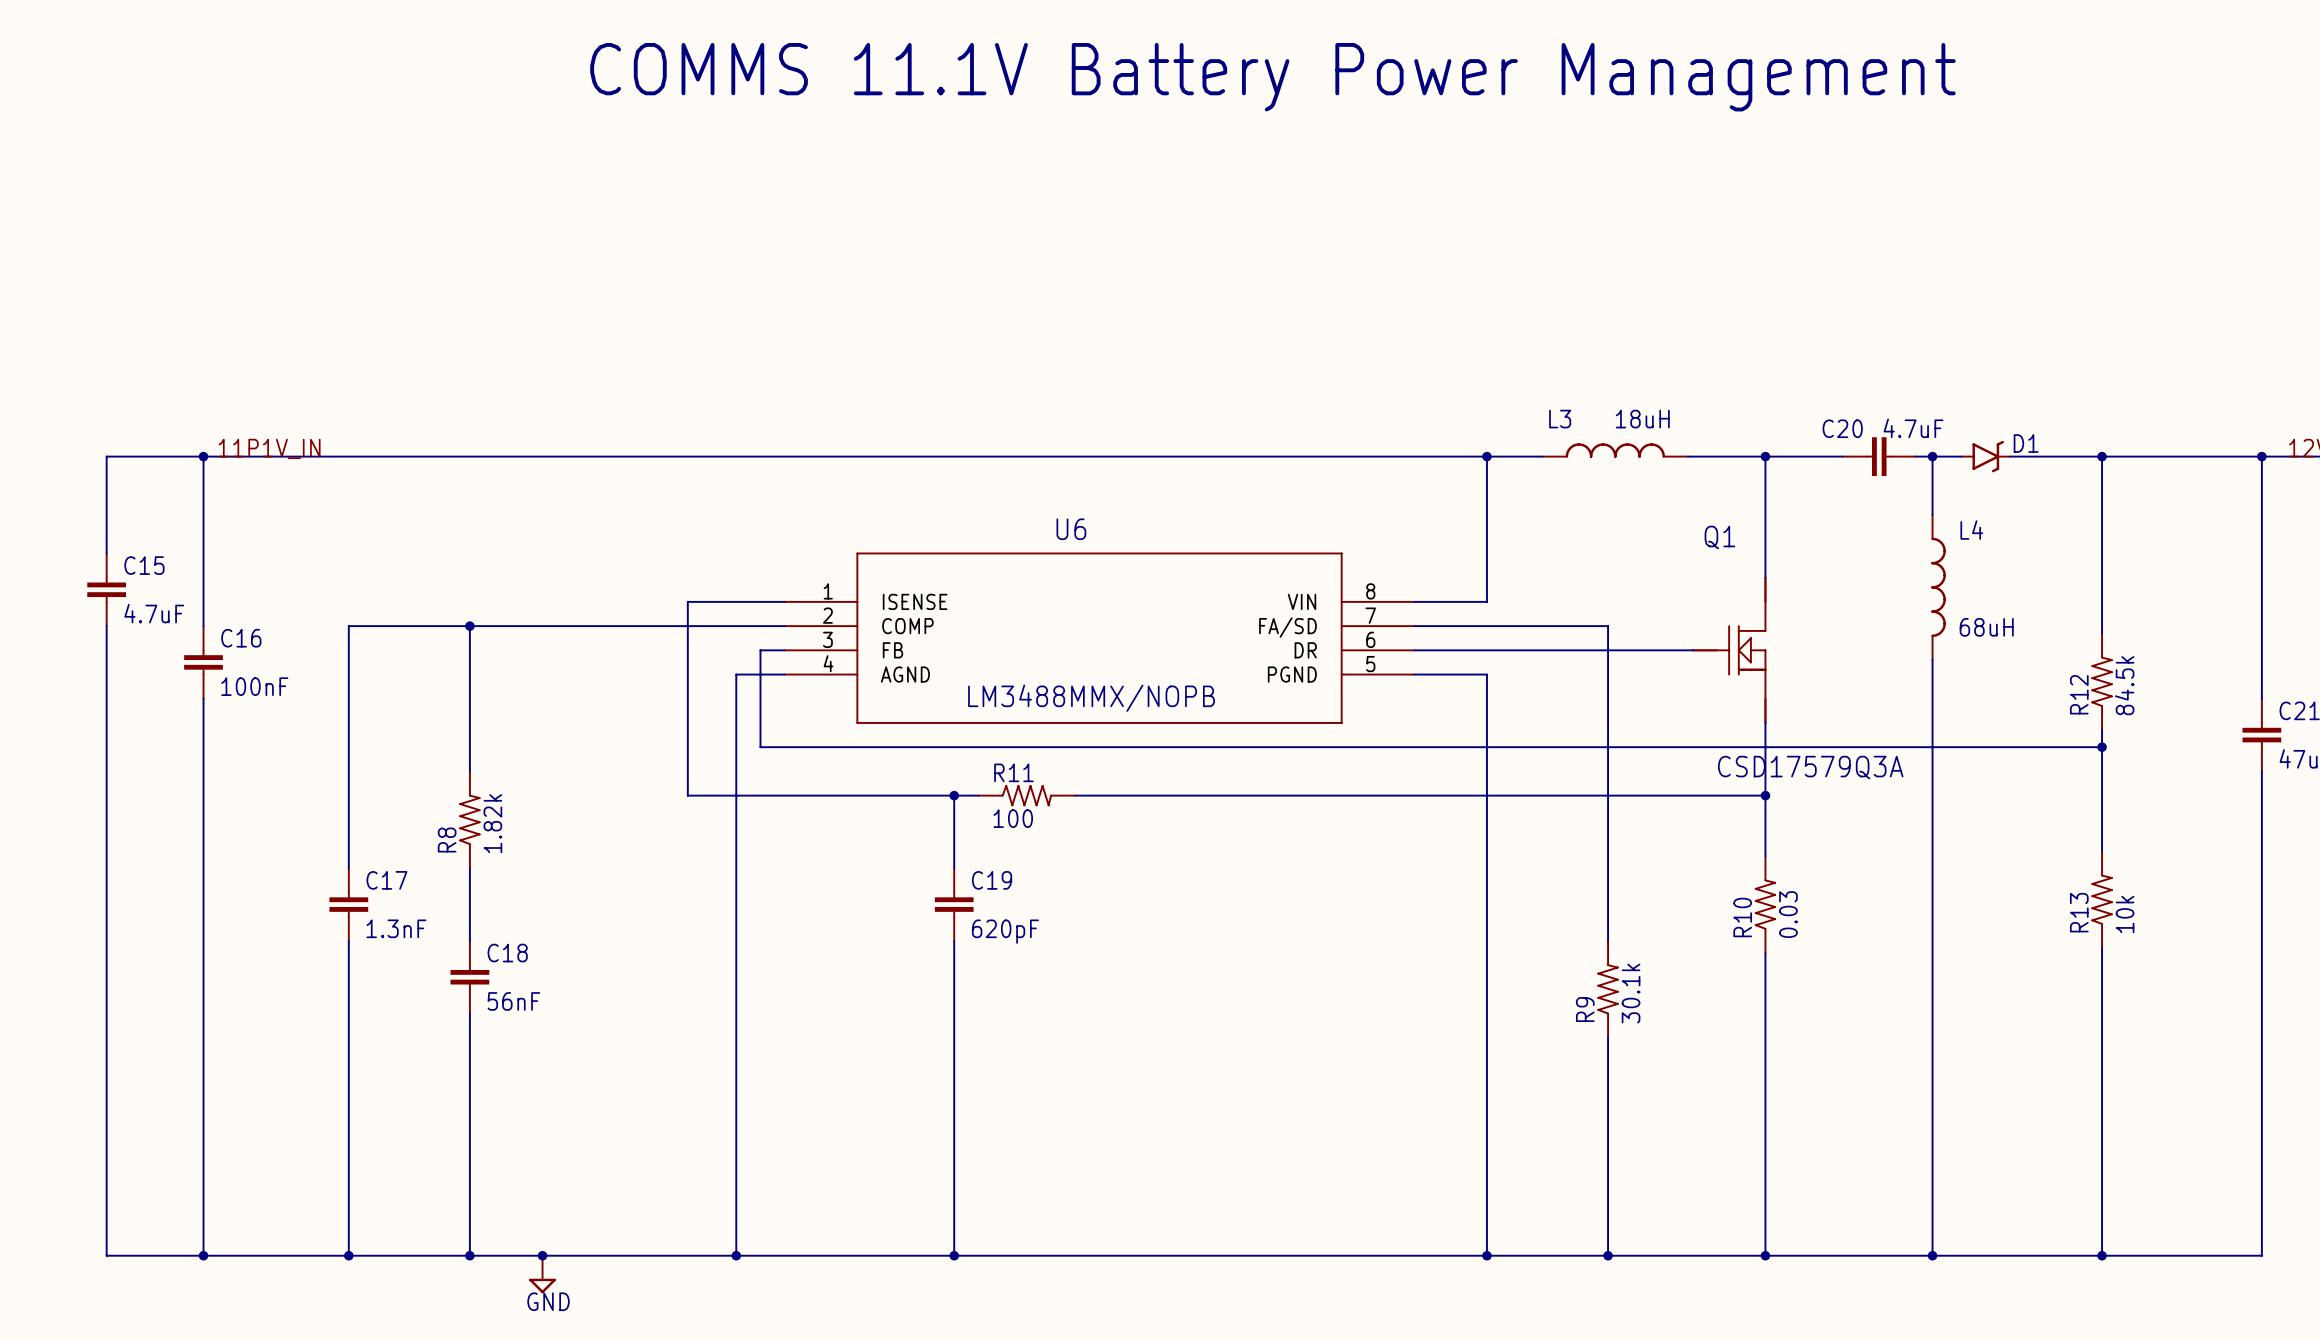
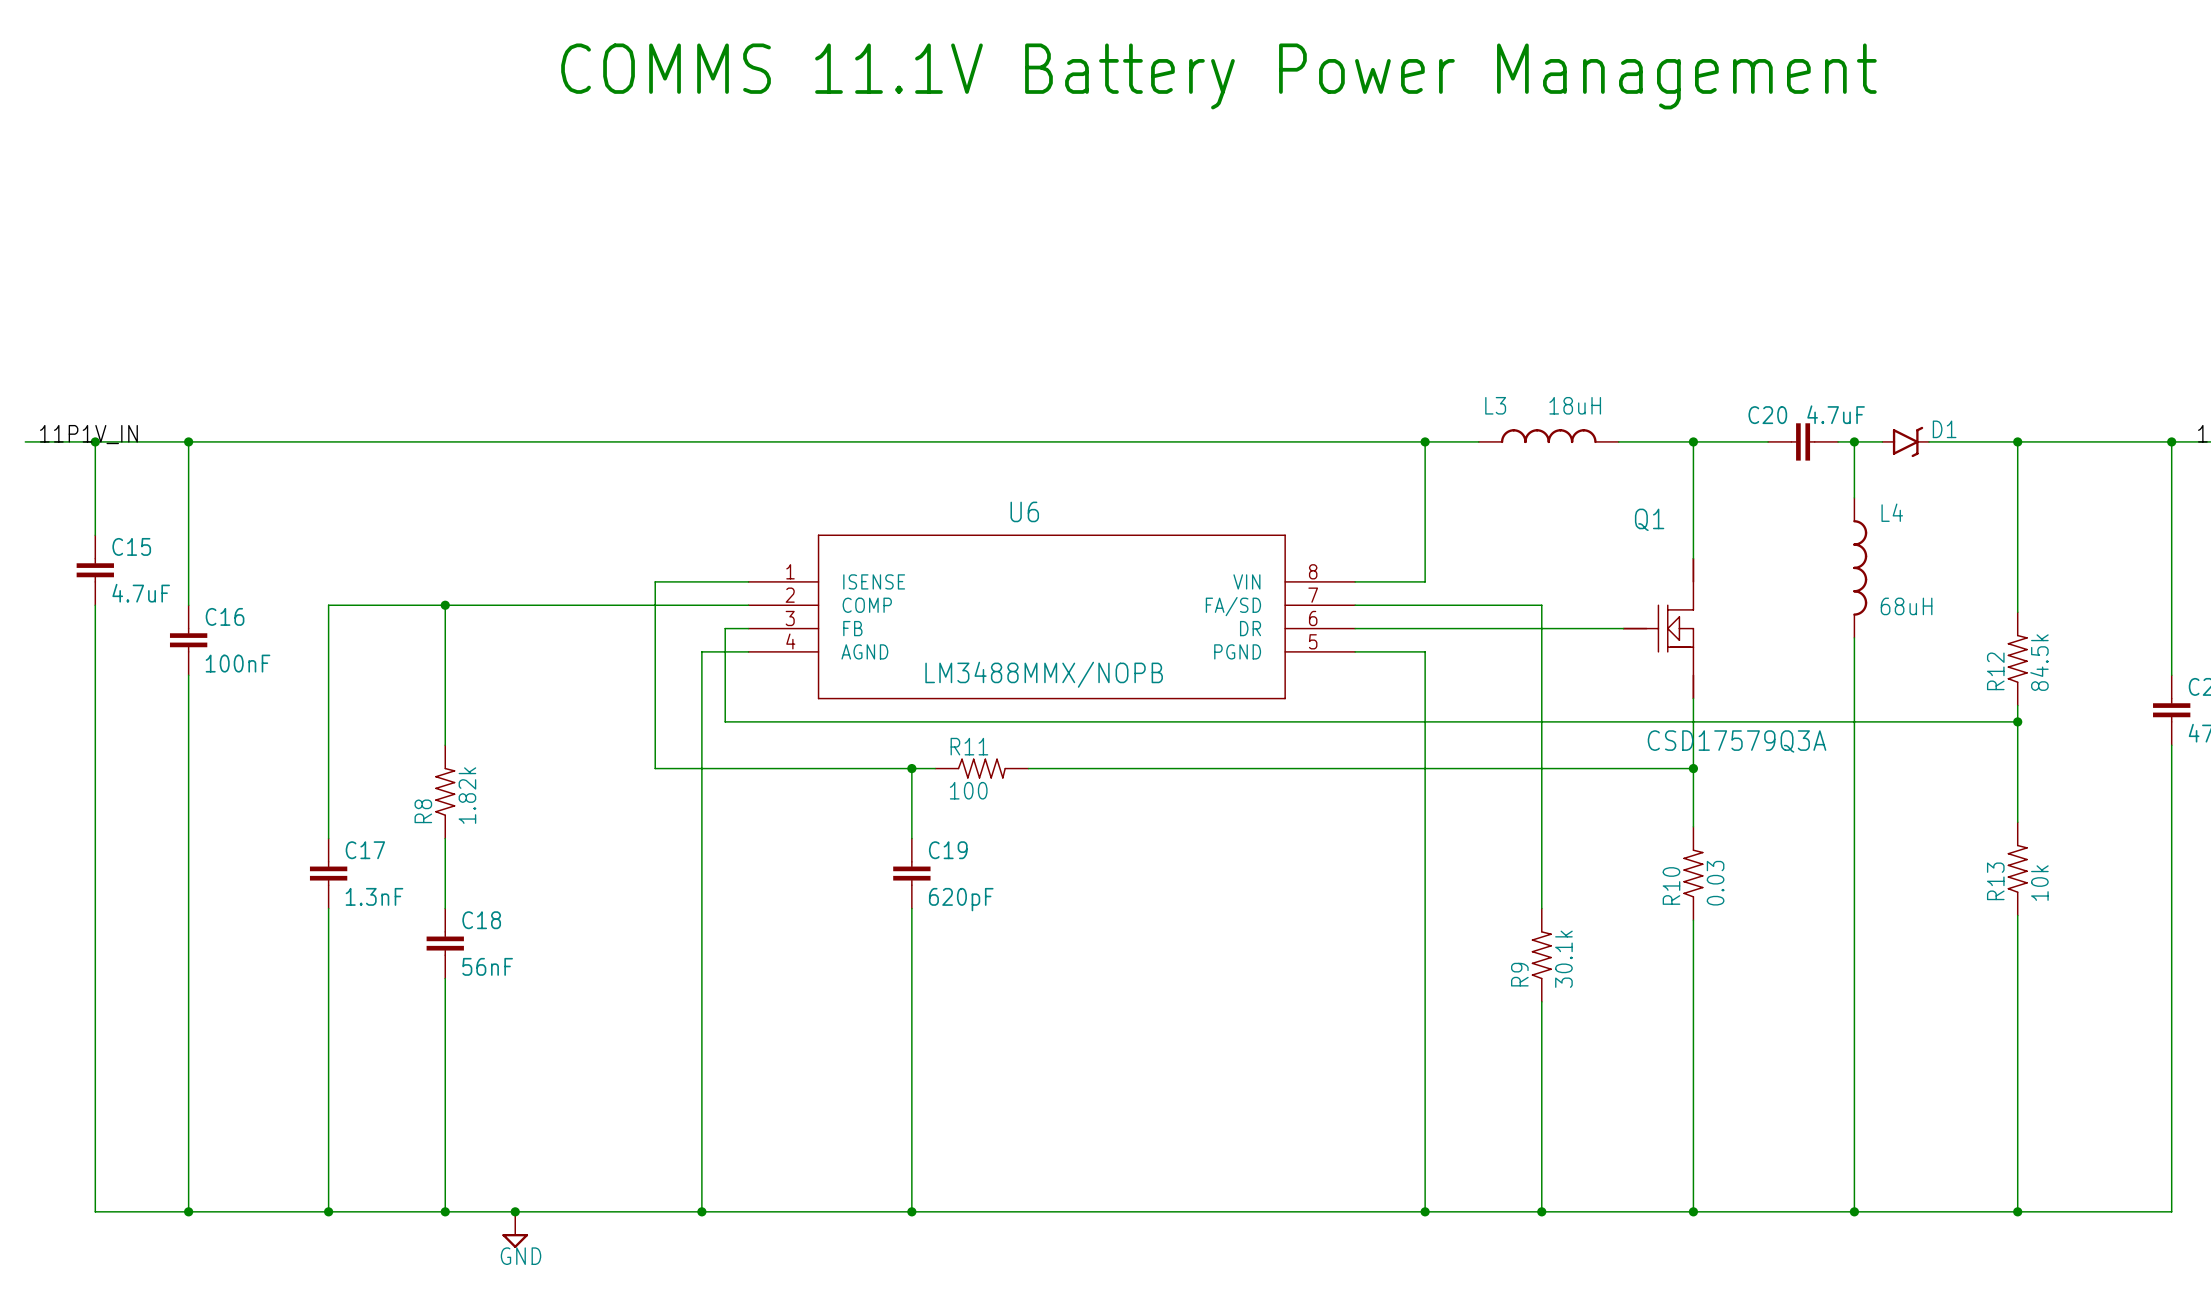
label position: 11P1V_IN (269, 448) -> 11P1V_IN (88, 434)
wire: none -> (25, 441) (95, 441)
junction: none -> (95, 441)

